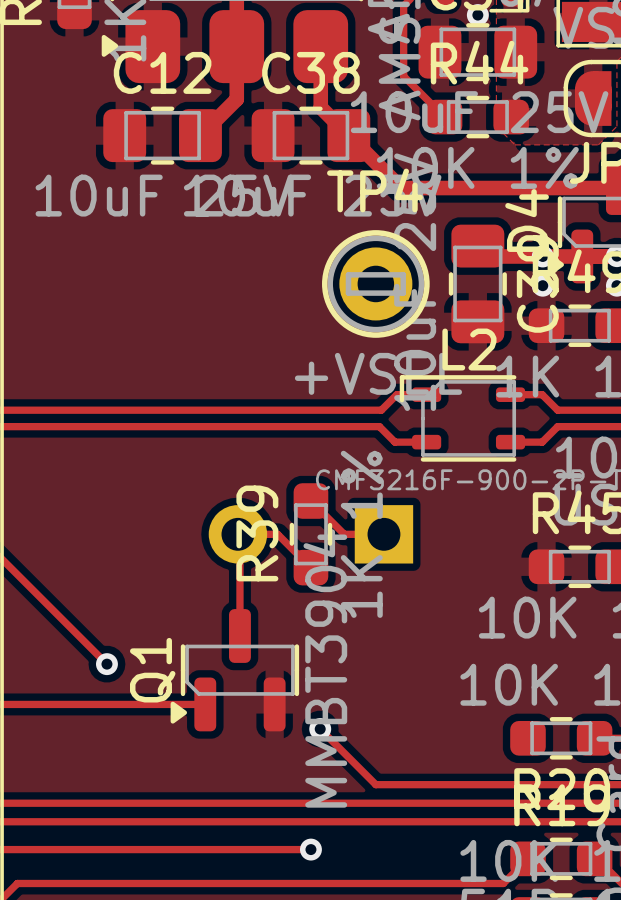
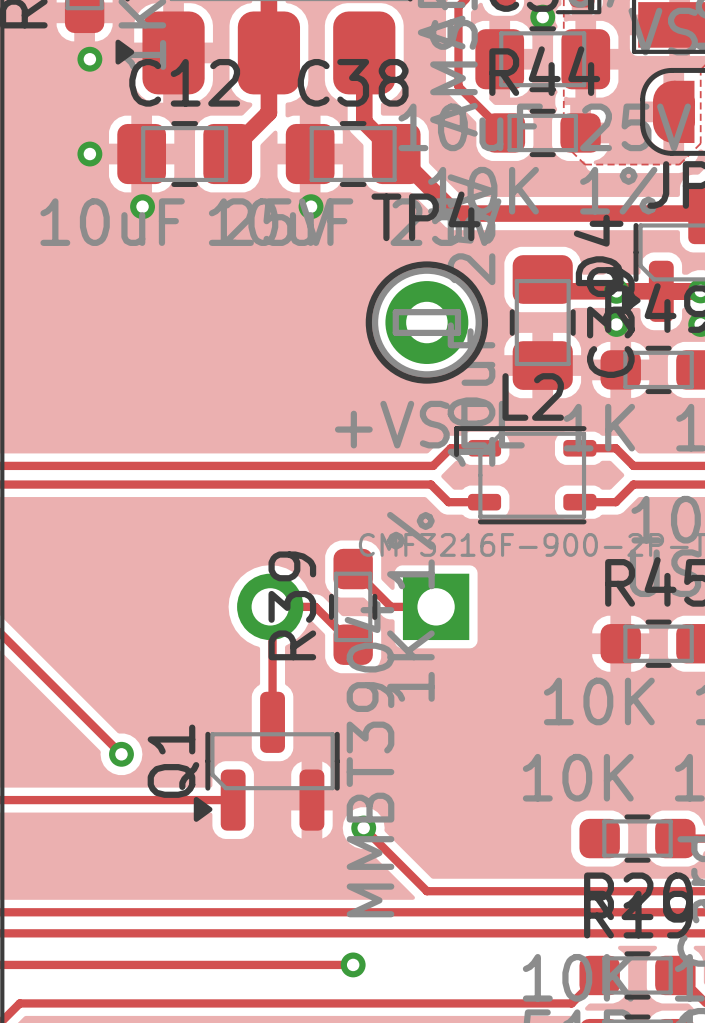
via: none -> (89, 59)
via: none -> (89, 154)
via: none -> (142, 206)
via: none -> (311, 206)

